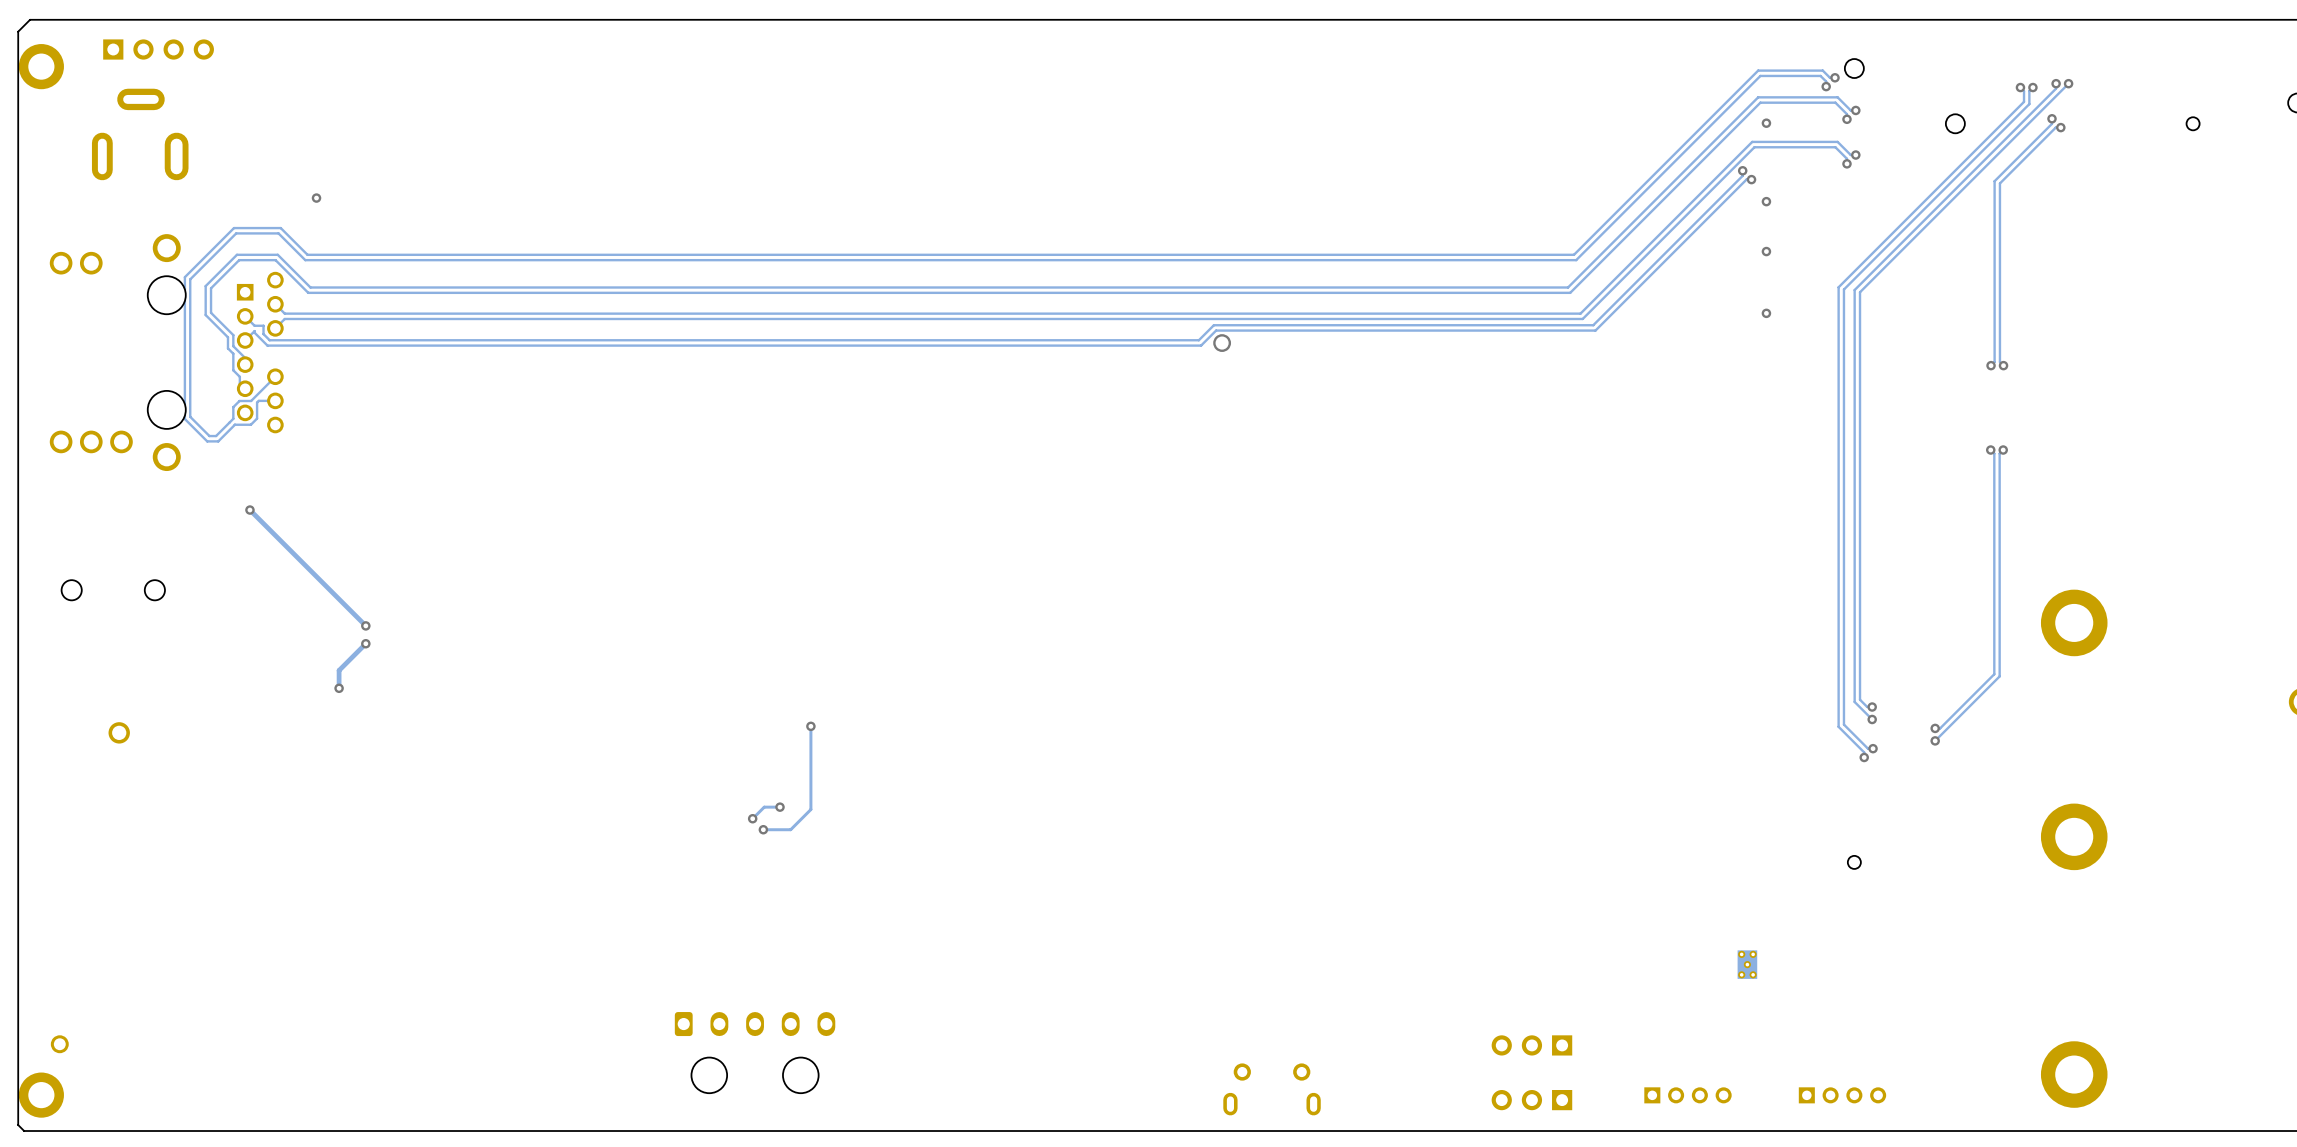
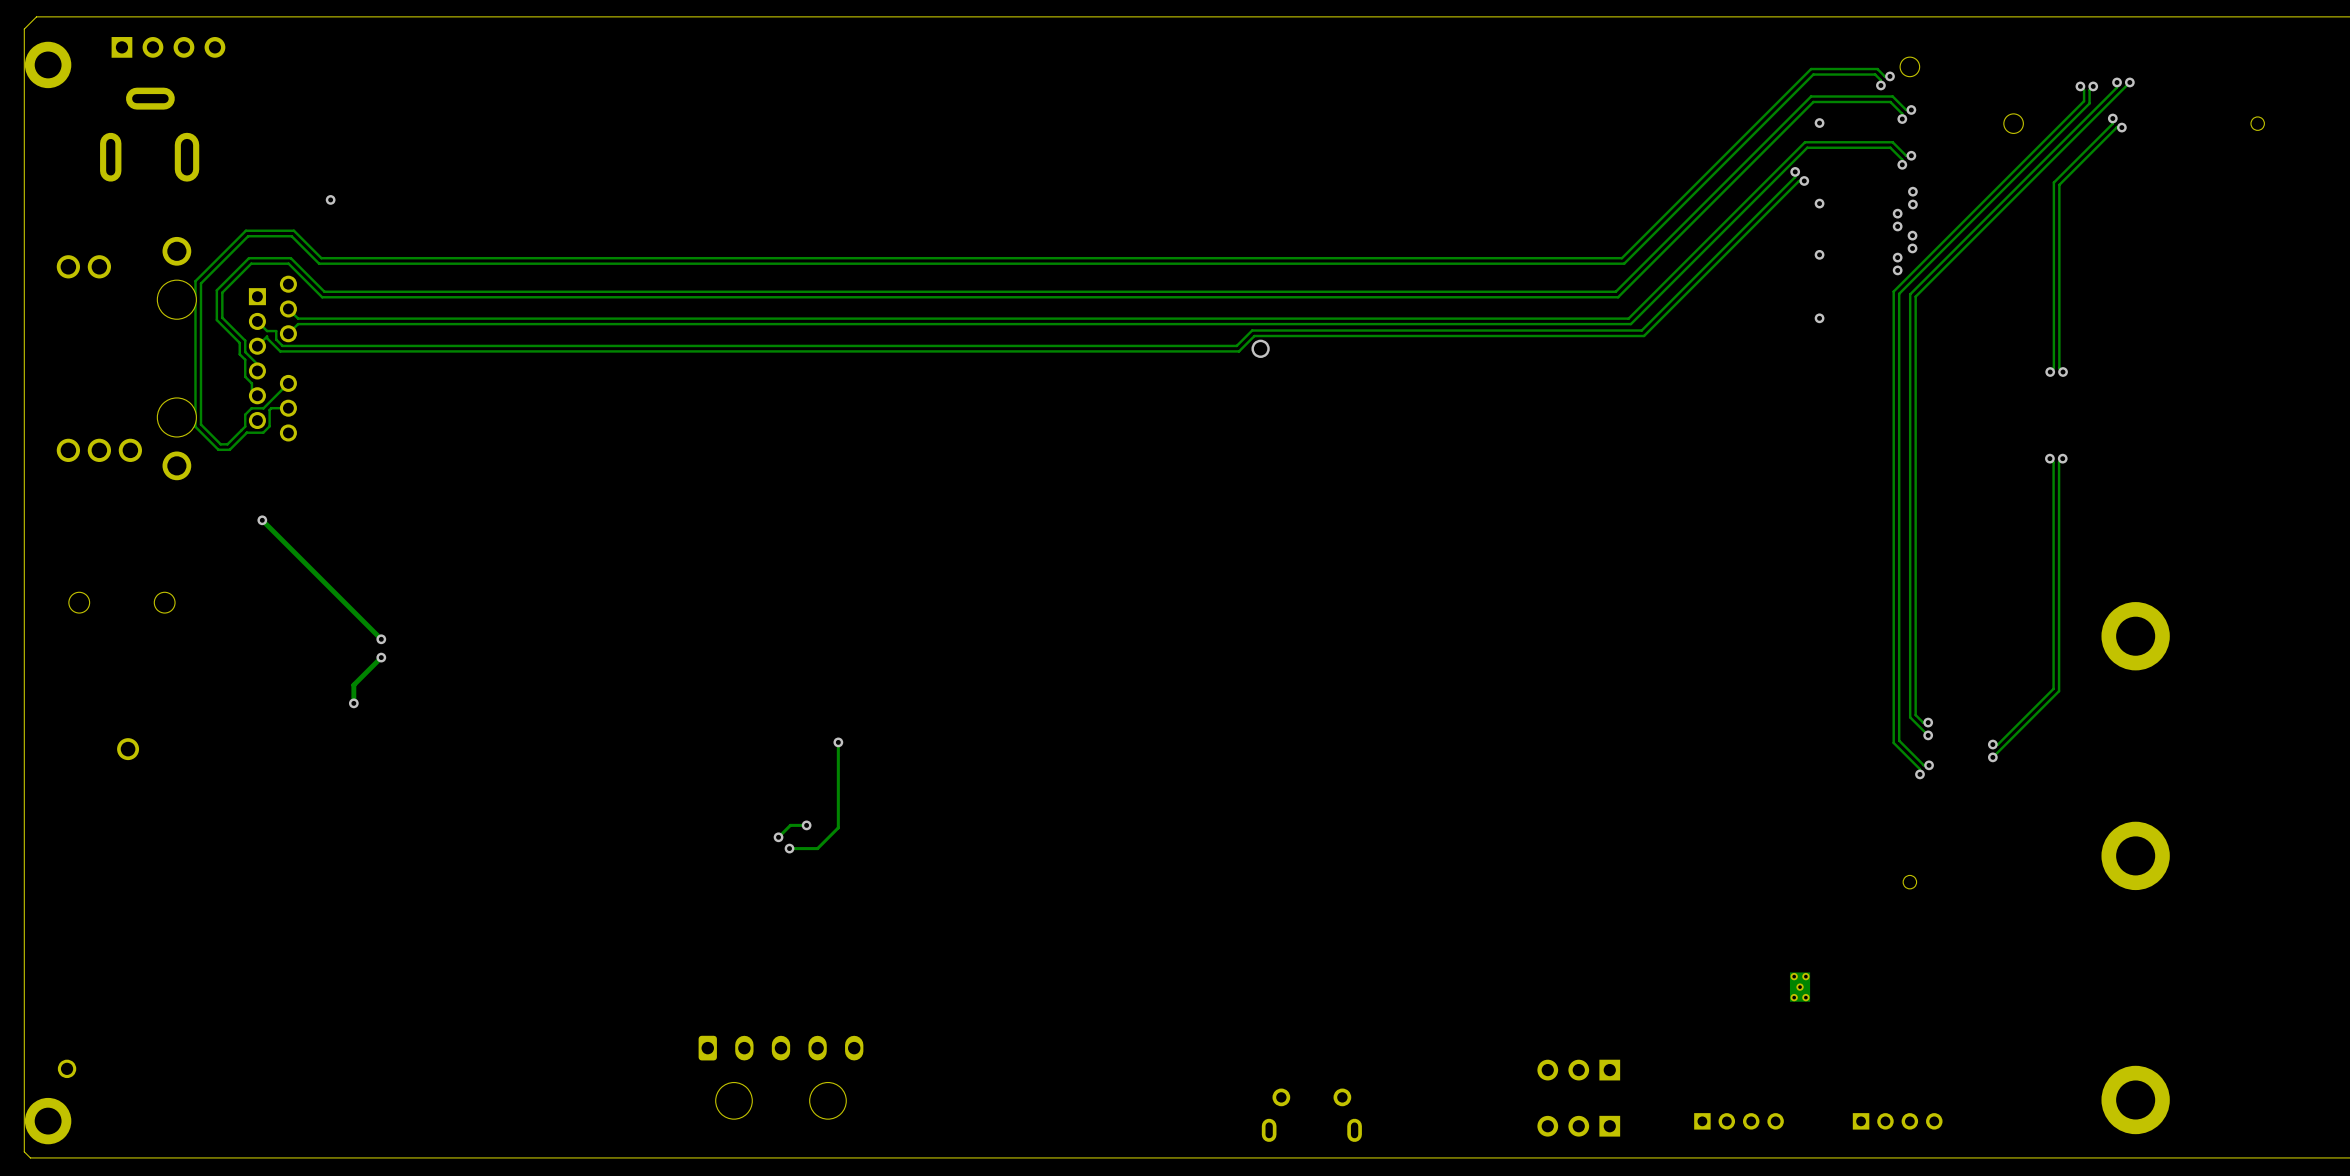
via: none -> (1912, 191)
via: none -> (1912, 204)
via: none -> (1897, 213)
via: none -> (1897, 226)
via: none -> (1912, 235)
via: none -> (1912, 248)
via: none -> (1897, 257)
via: none -> (1897, 270)

